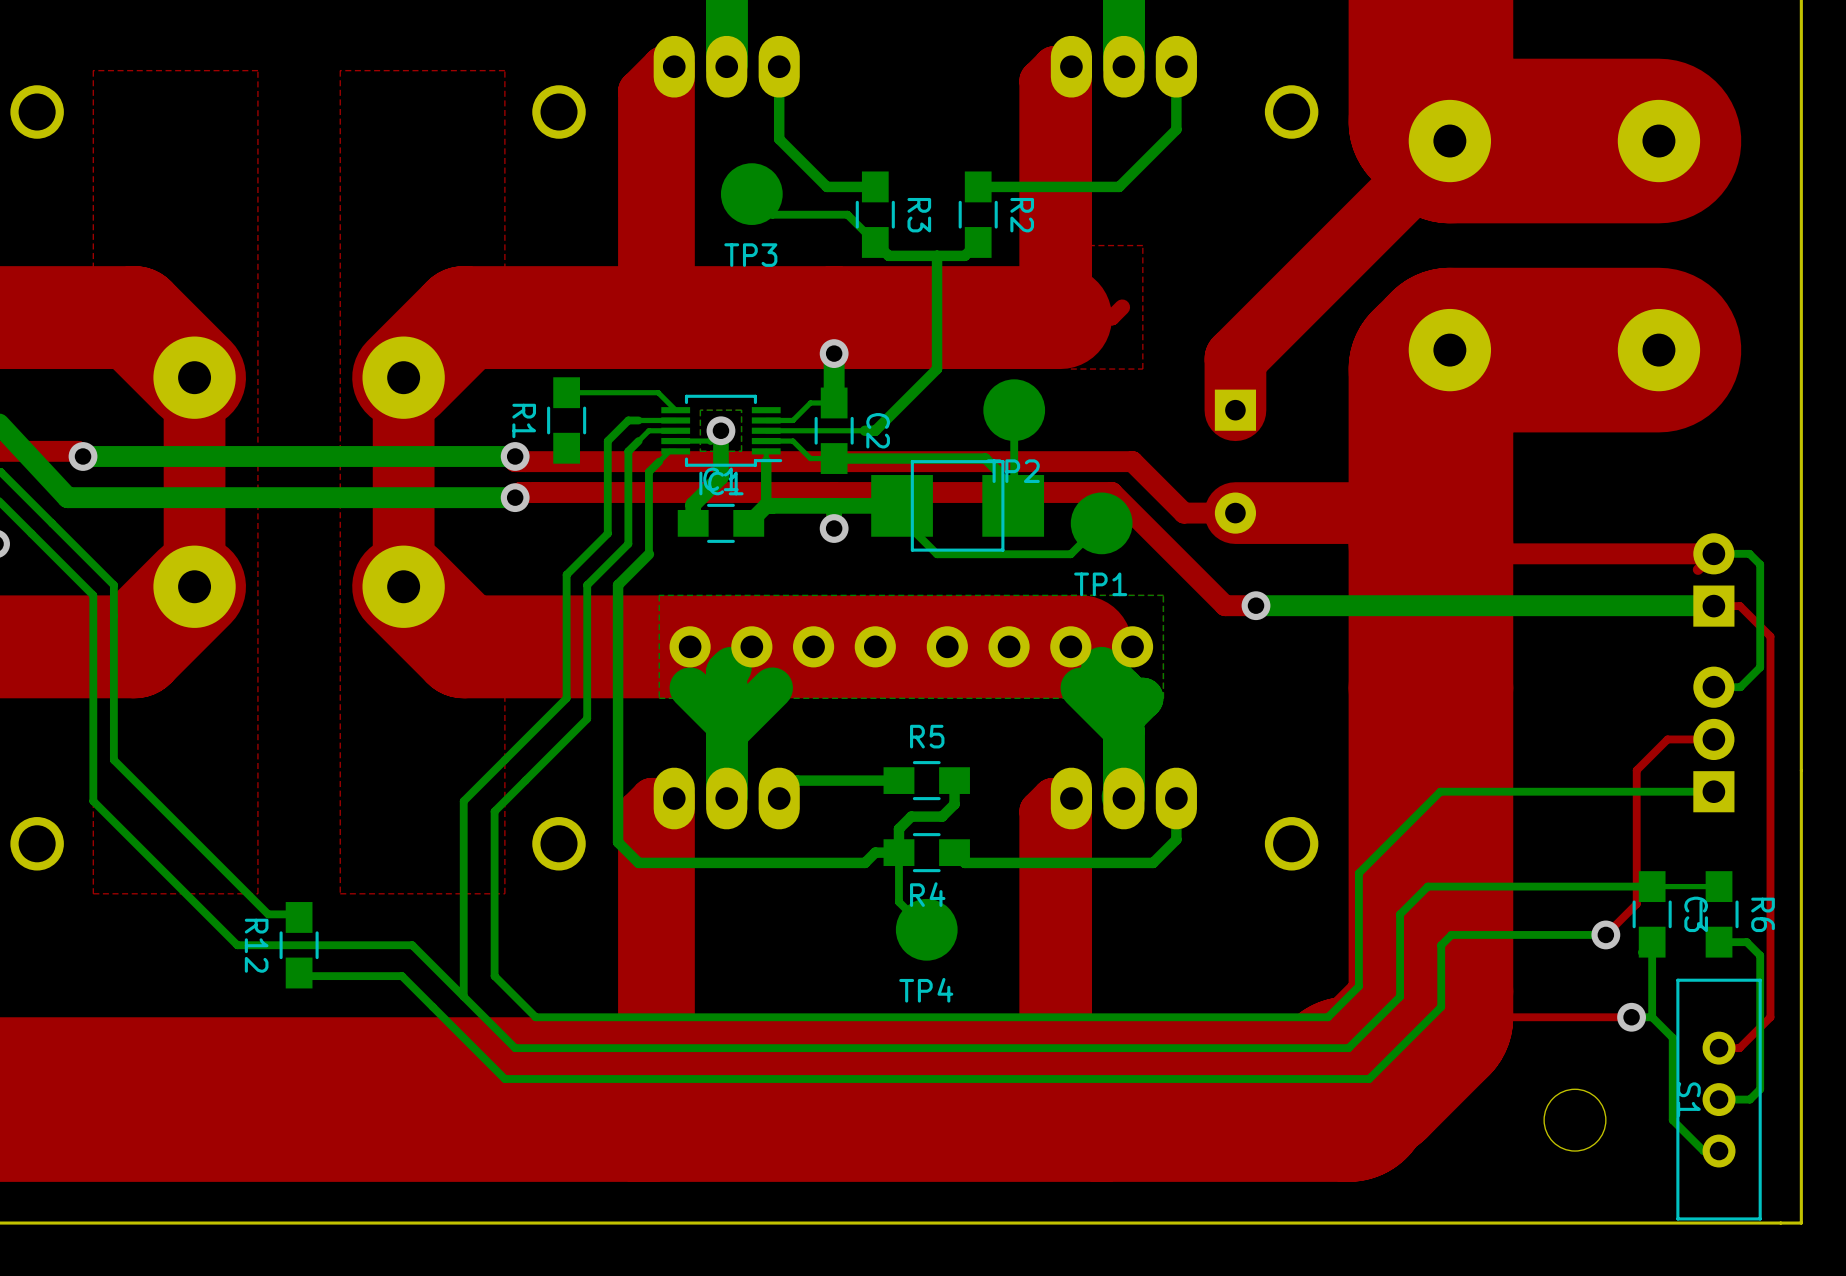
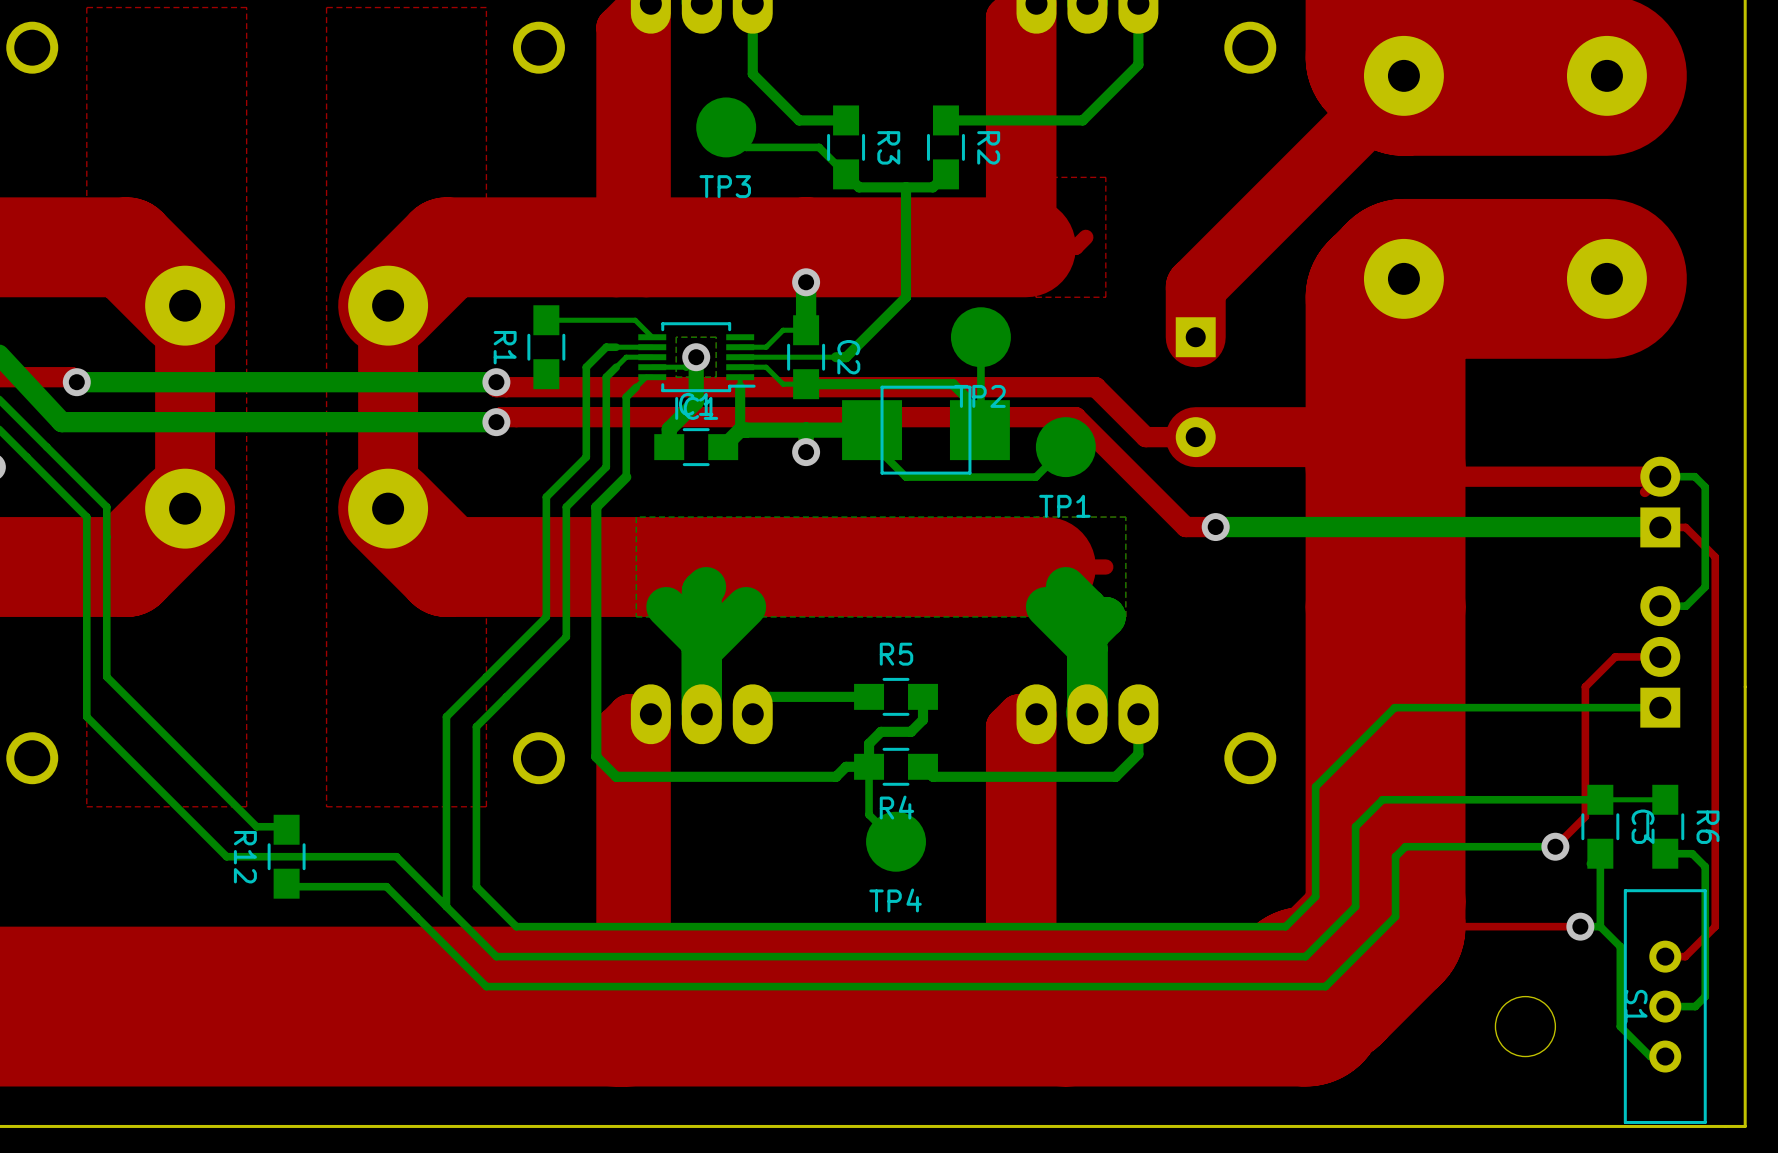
part: (690, 646) -> none
part: (751, 646) -> none
part: (813, 646) -> none
part: (875, 646) -> none
part: (947, 646) -> none
part: (1009, 646) -> none
part: (1070, 646) -> none
part: (1132, 646) -> none

